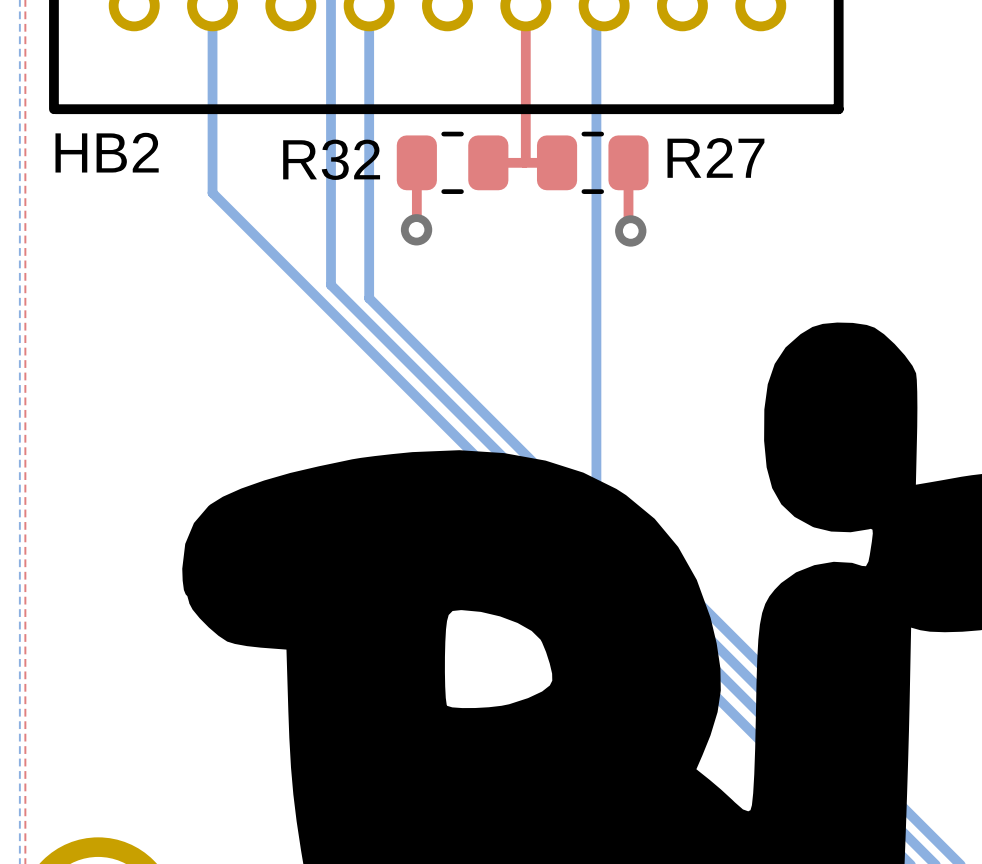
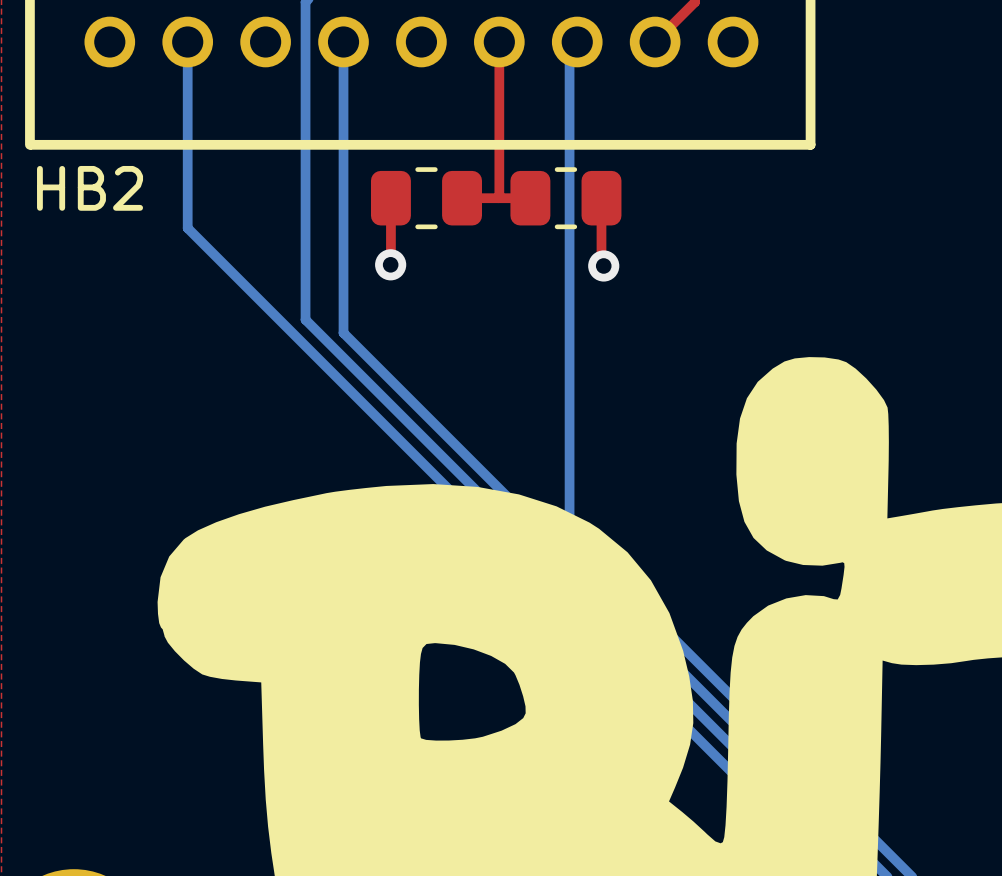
R27 name: R27 (715, 157) -> none
R32 name: R32 (331, 159) -> none

